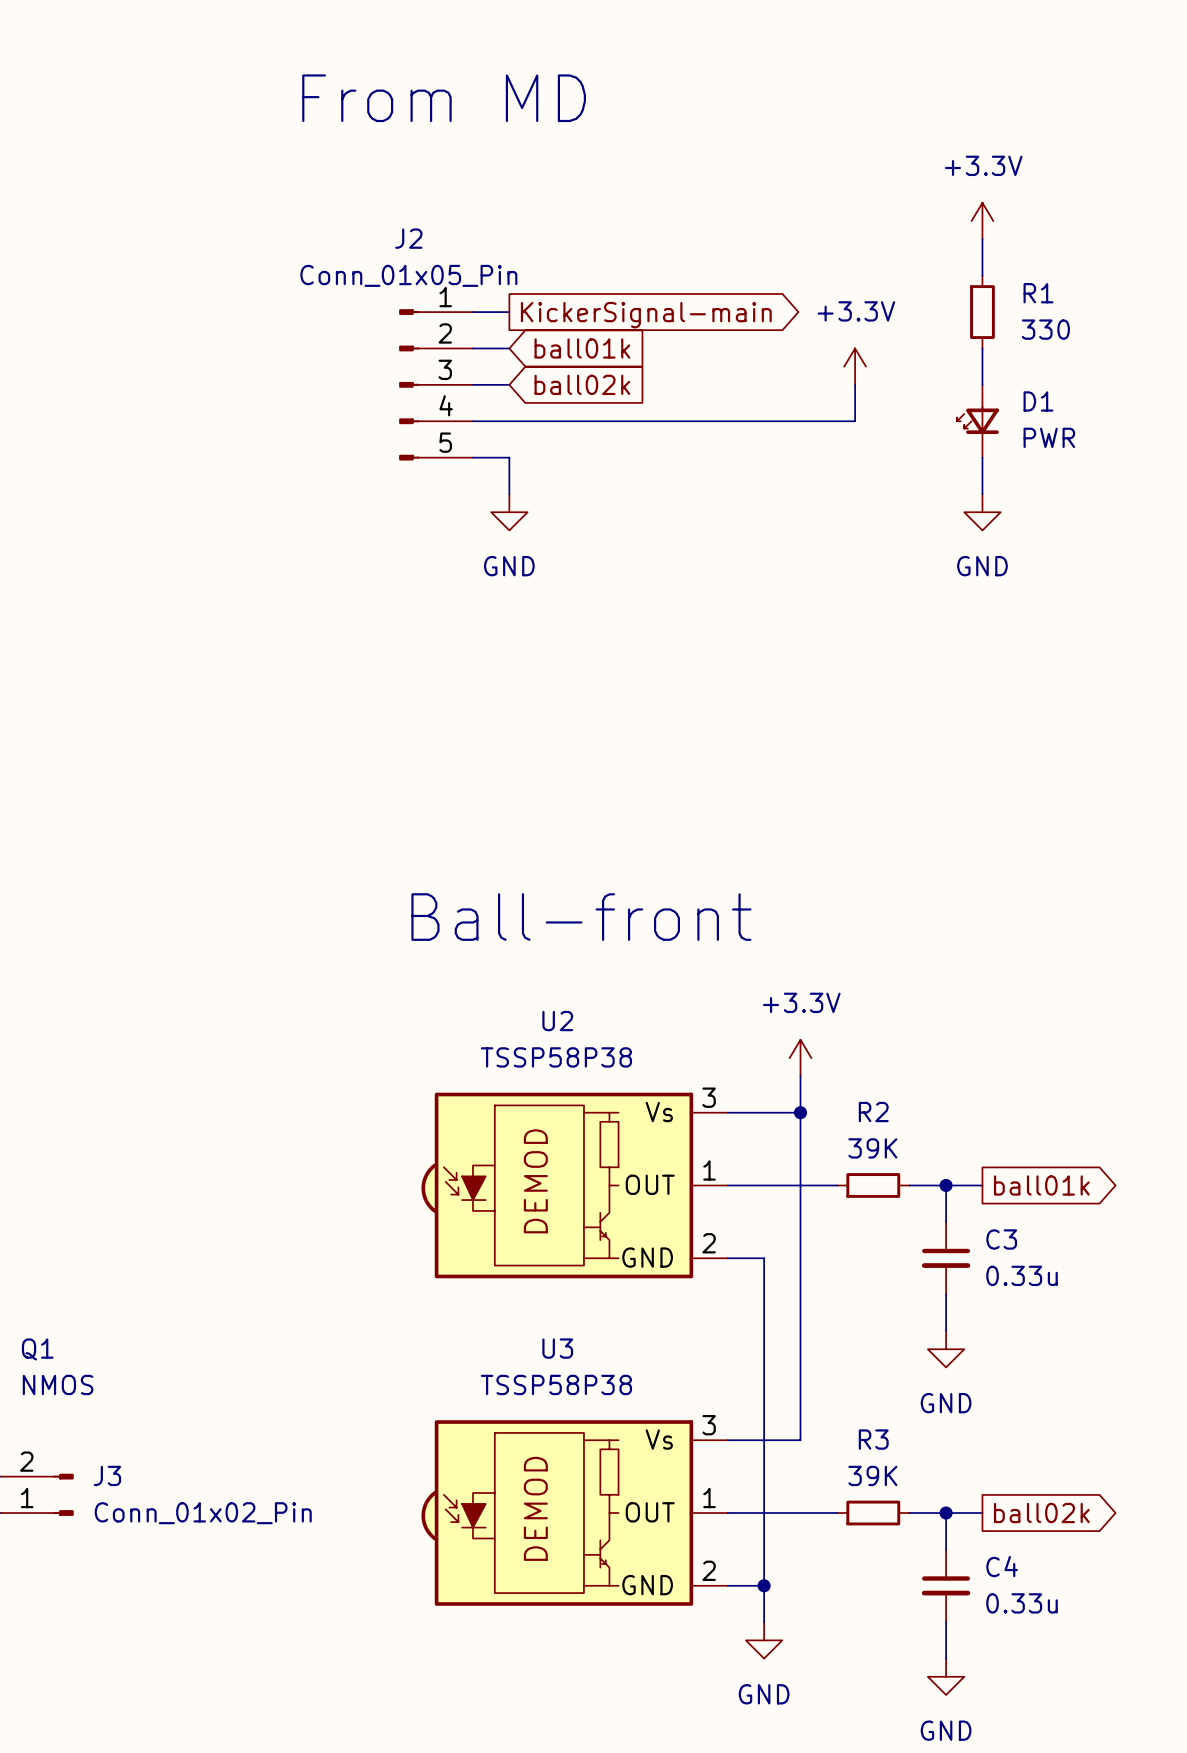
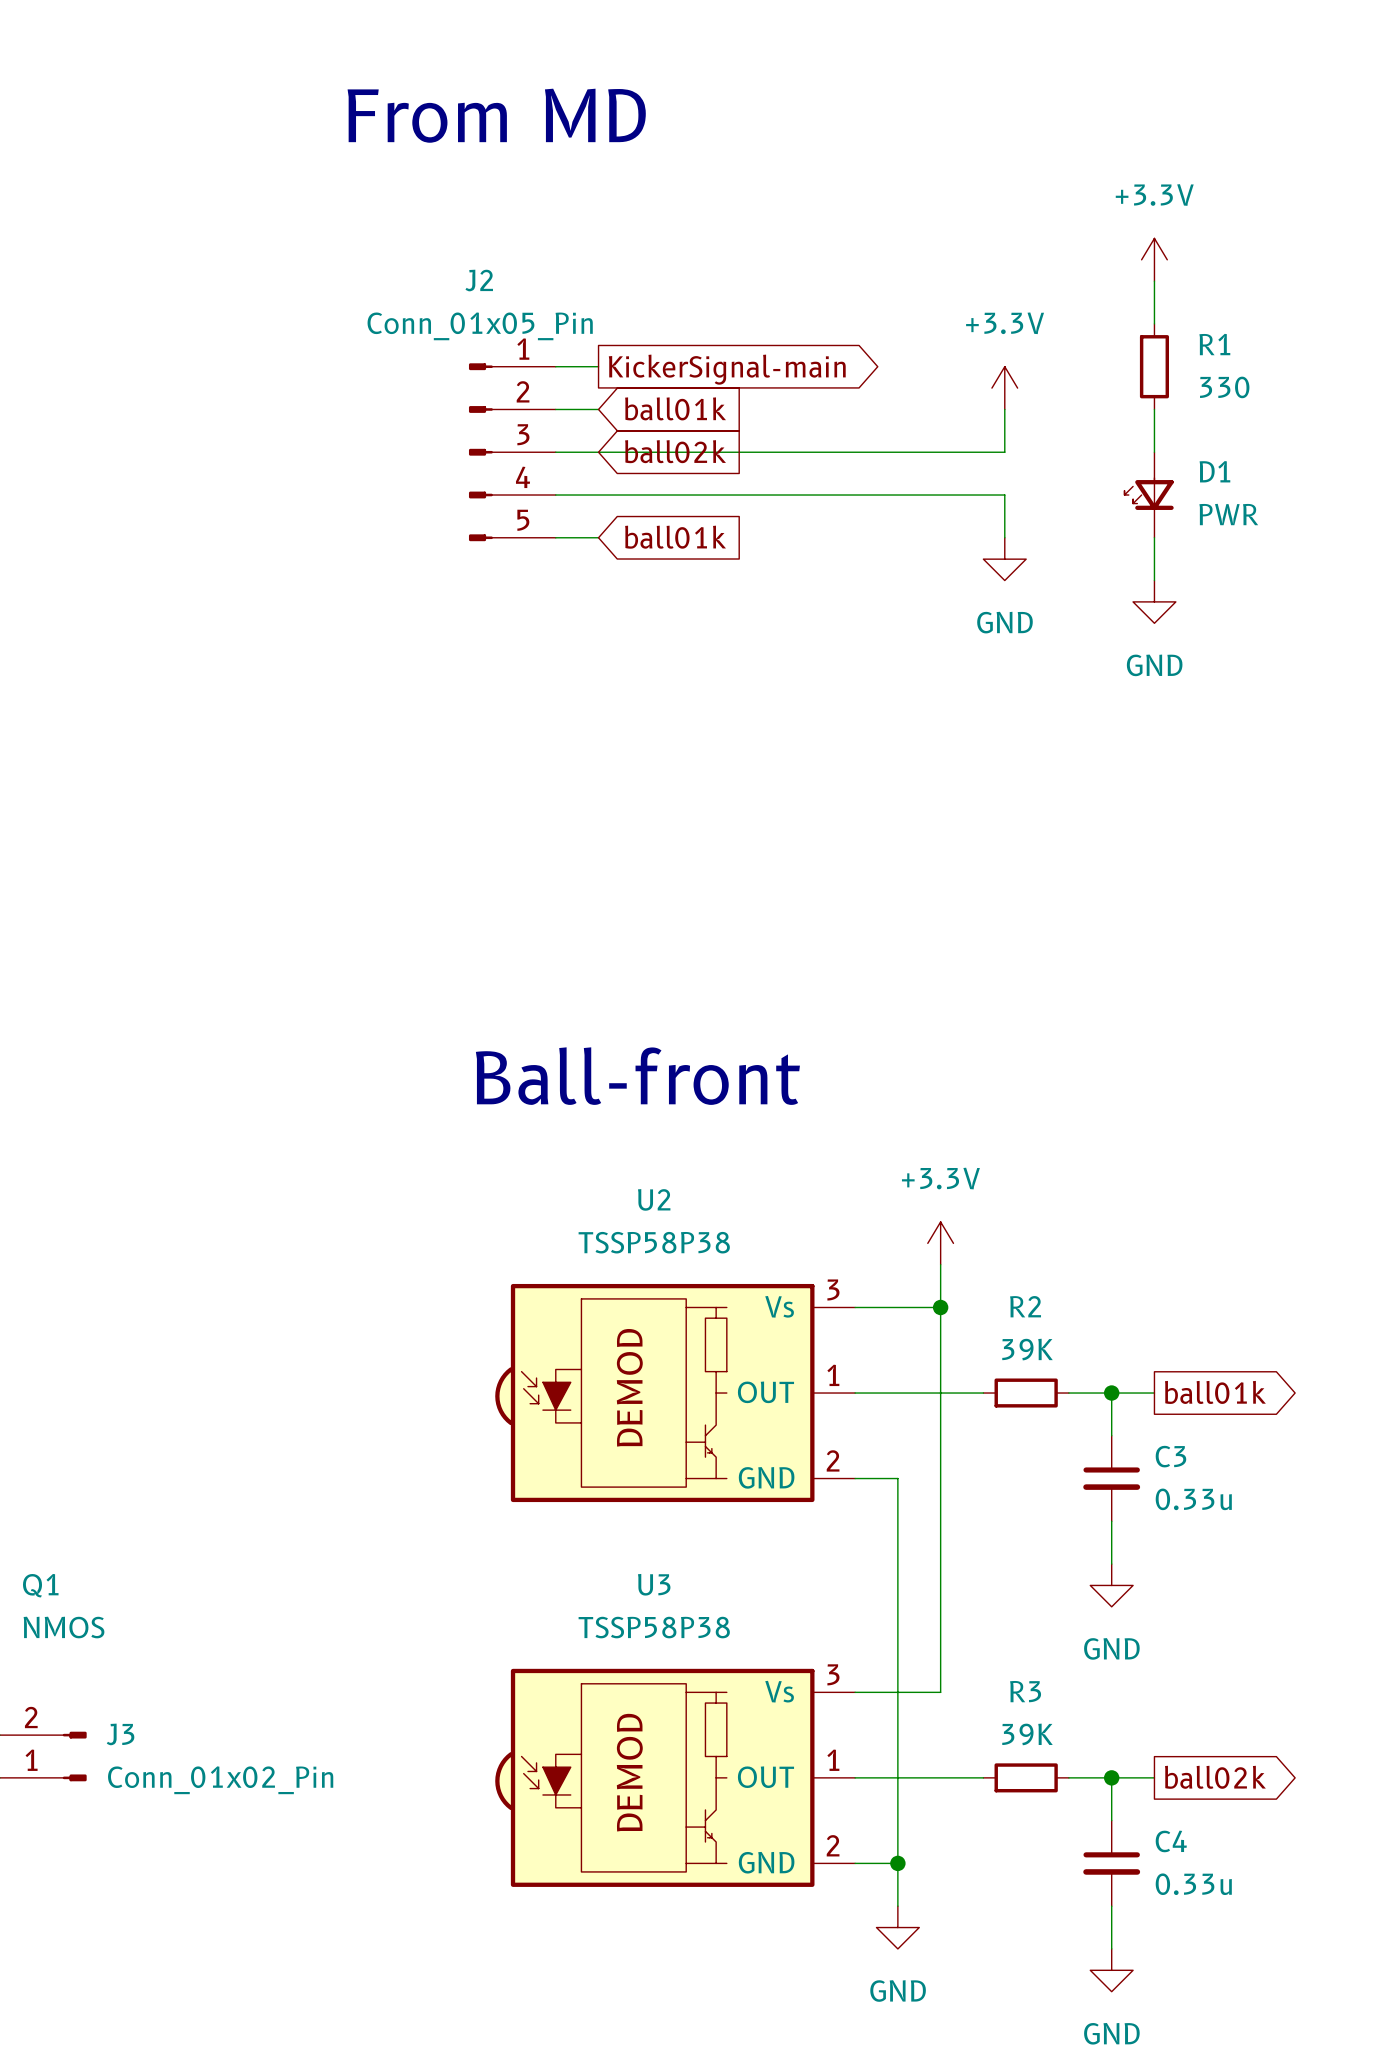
wire: none -> (1004, 409) (1004, 452) (598, 452)
power symbol position: +3.3V (855, 366) -> +3.3V (1004, 388)
wire: (855, 384) (855, 421) -> (1004, 537) (1004, 495)
wire: (509, 457) (509, 494) -> none
global label: none -> ball01k (675, 537)
power symbol position: GND (509, 512) -> GND (1004, 559)

